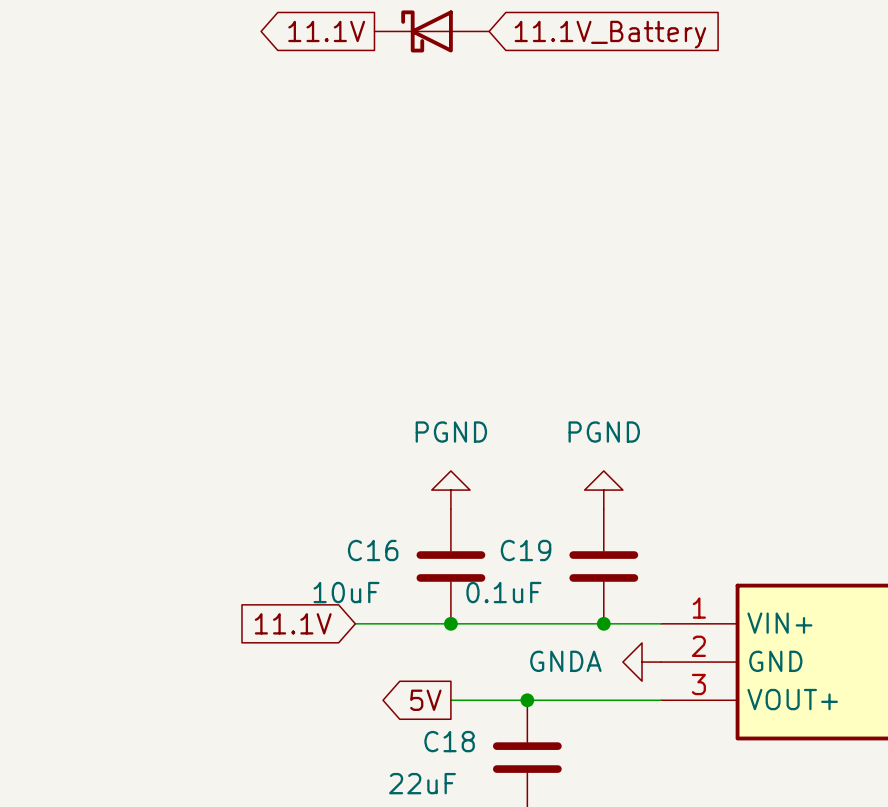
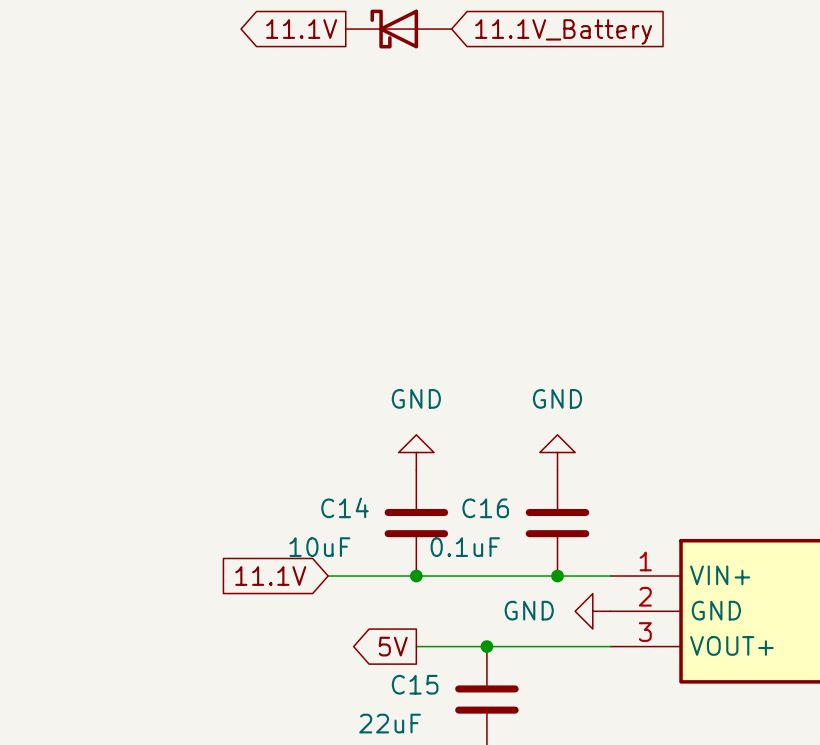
power symbol: PGND (450, 490) -> GND (416, 452)
power symbol: PGND (603, 490) -> GND (557, 452)
C16 name: C16 (373, 550) -> C14 (344, 507)
C19 name: C19 (526, 550) -> C16 (485, 508)
power symbol: GNDA (642, 662) -> GND (592, 611)
C18 name: C18 (449, 741) -> C15 (415, 684)

